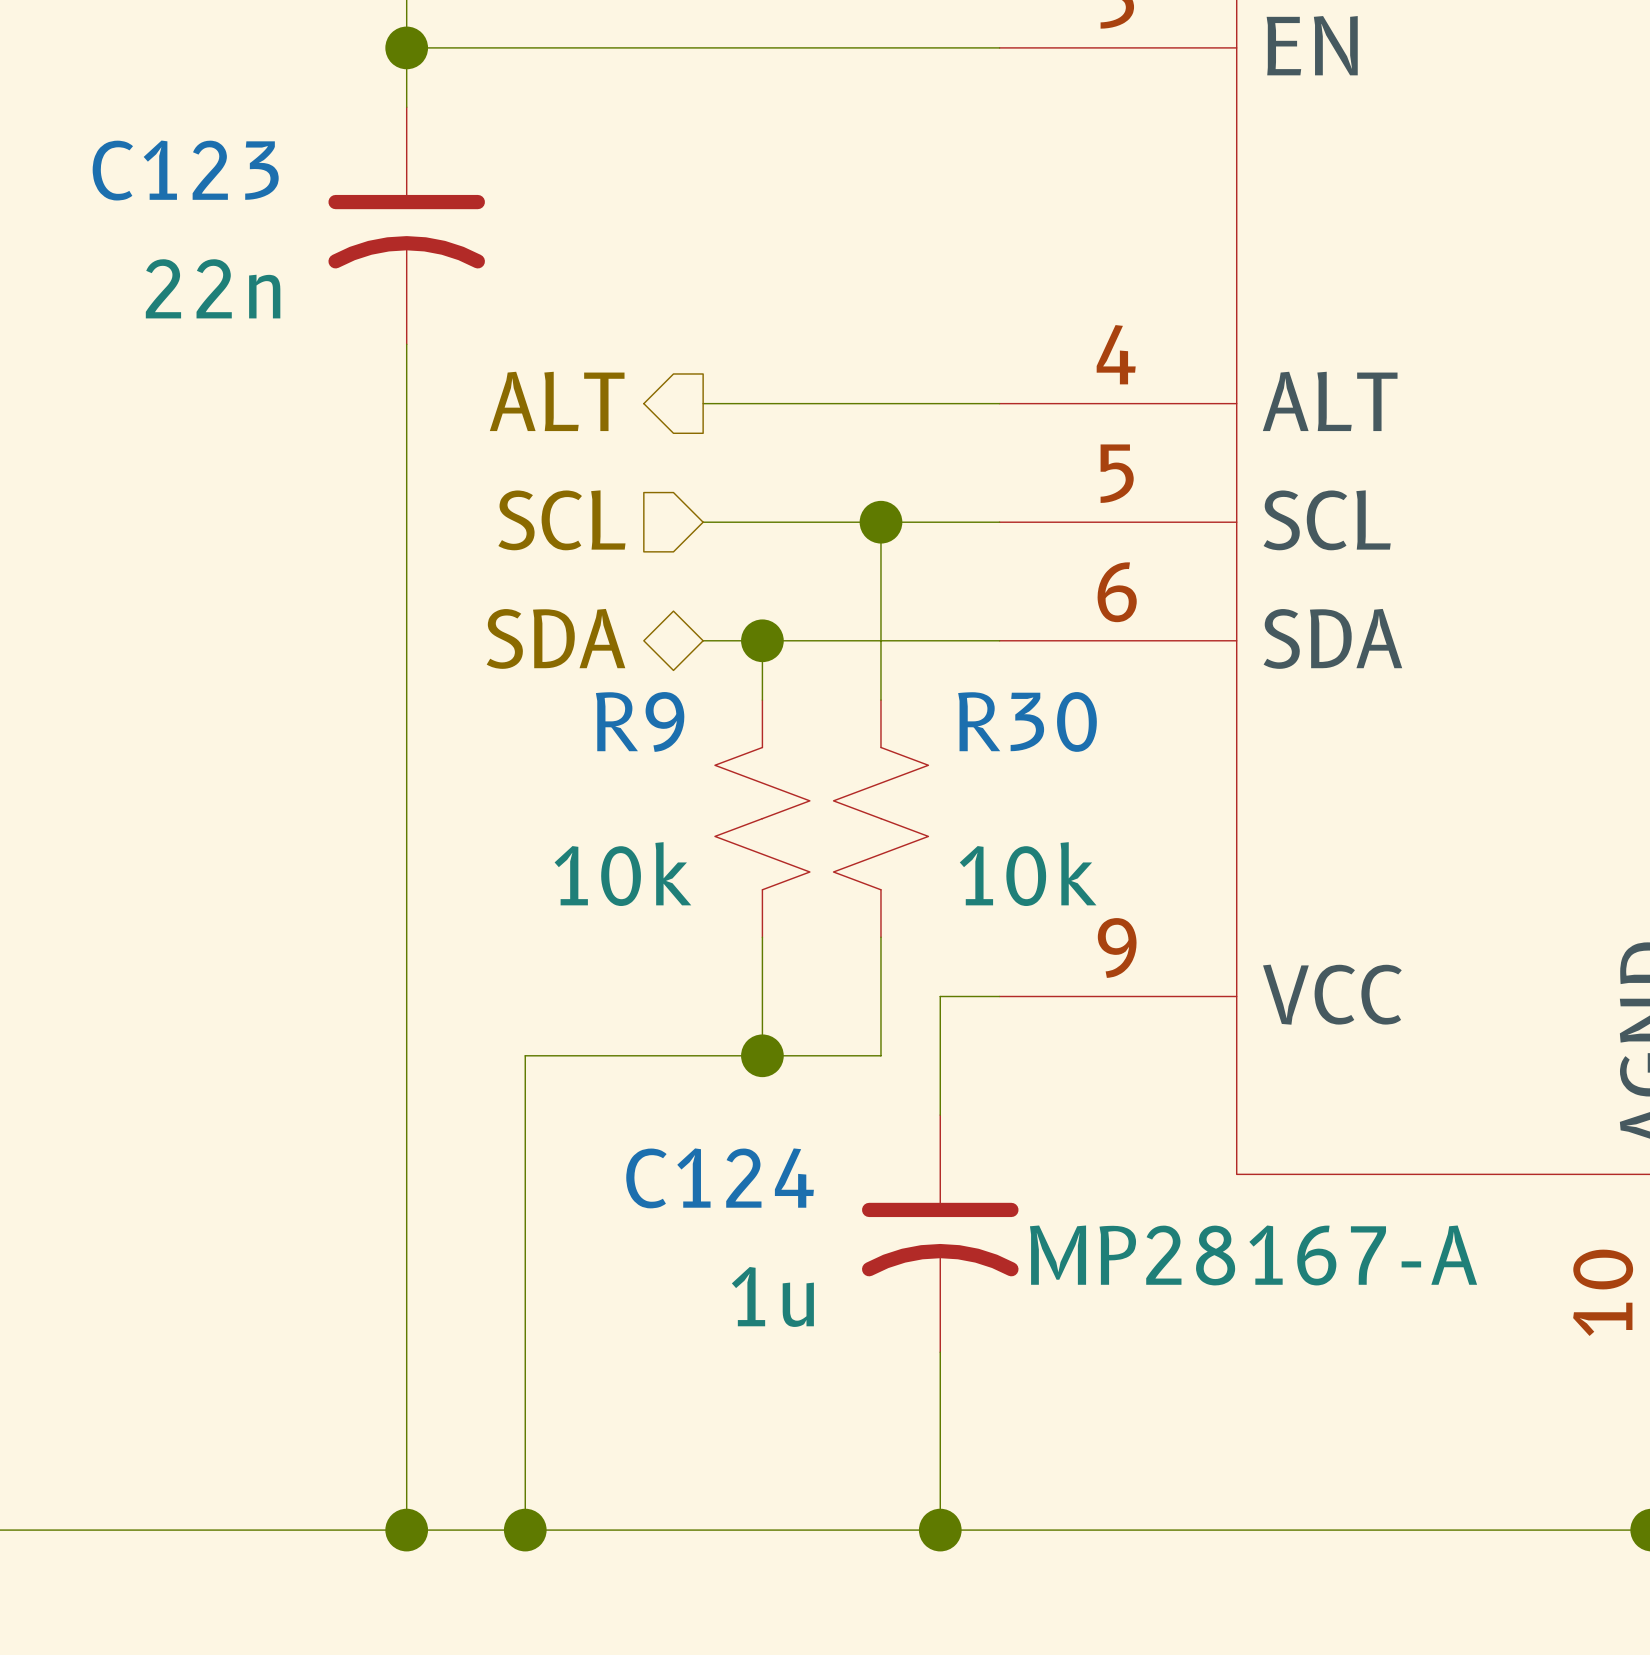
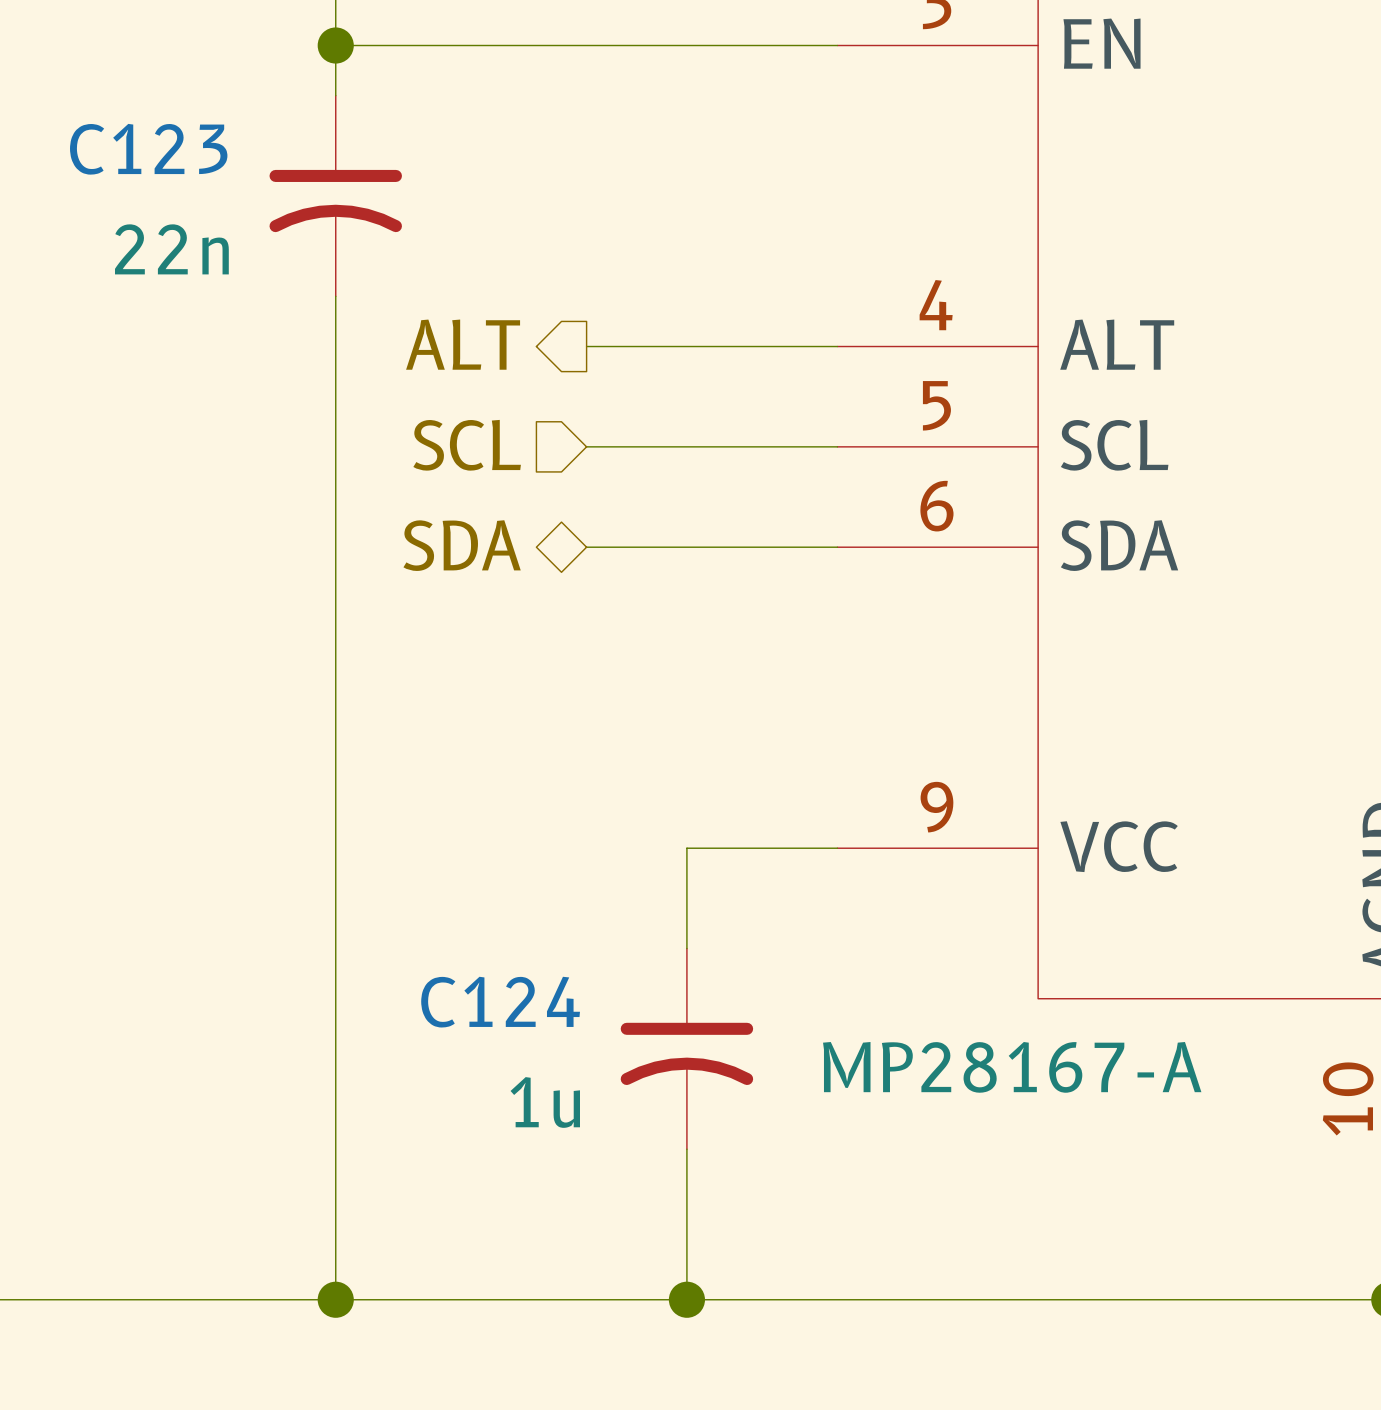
wire: (880, 522) (880, 700) -> none
junction: (880, 522) -> none
wire: (762, 640) (762, 700) -> none
junction: (762, 640) -> none
R9: 10k (762, 818) -> none
R30: 10k (880, 818) -> none
wire: (762, 937) (762, 1055) -> none
wire: (880, 937) (880, 1055) (525, 1055) (525, 1530) -> none
wire: (940, 996) (940, 1115) -> (787, 848) (686, 848) (686, 948)
junction: (762, 1055) -> none
C124 position: (940, 1233) -> (686, 1048)
part value position: MP28167-A (1253, 1255) -> MP28167-A (1012, 1067)
wire: (940, 1352) (940, 1530) -> (686, 1149) (686, 1299)
junction: (525, 1530) -> none
junction position: (940, 1530) -> (686, 1299)

